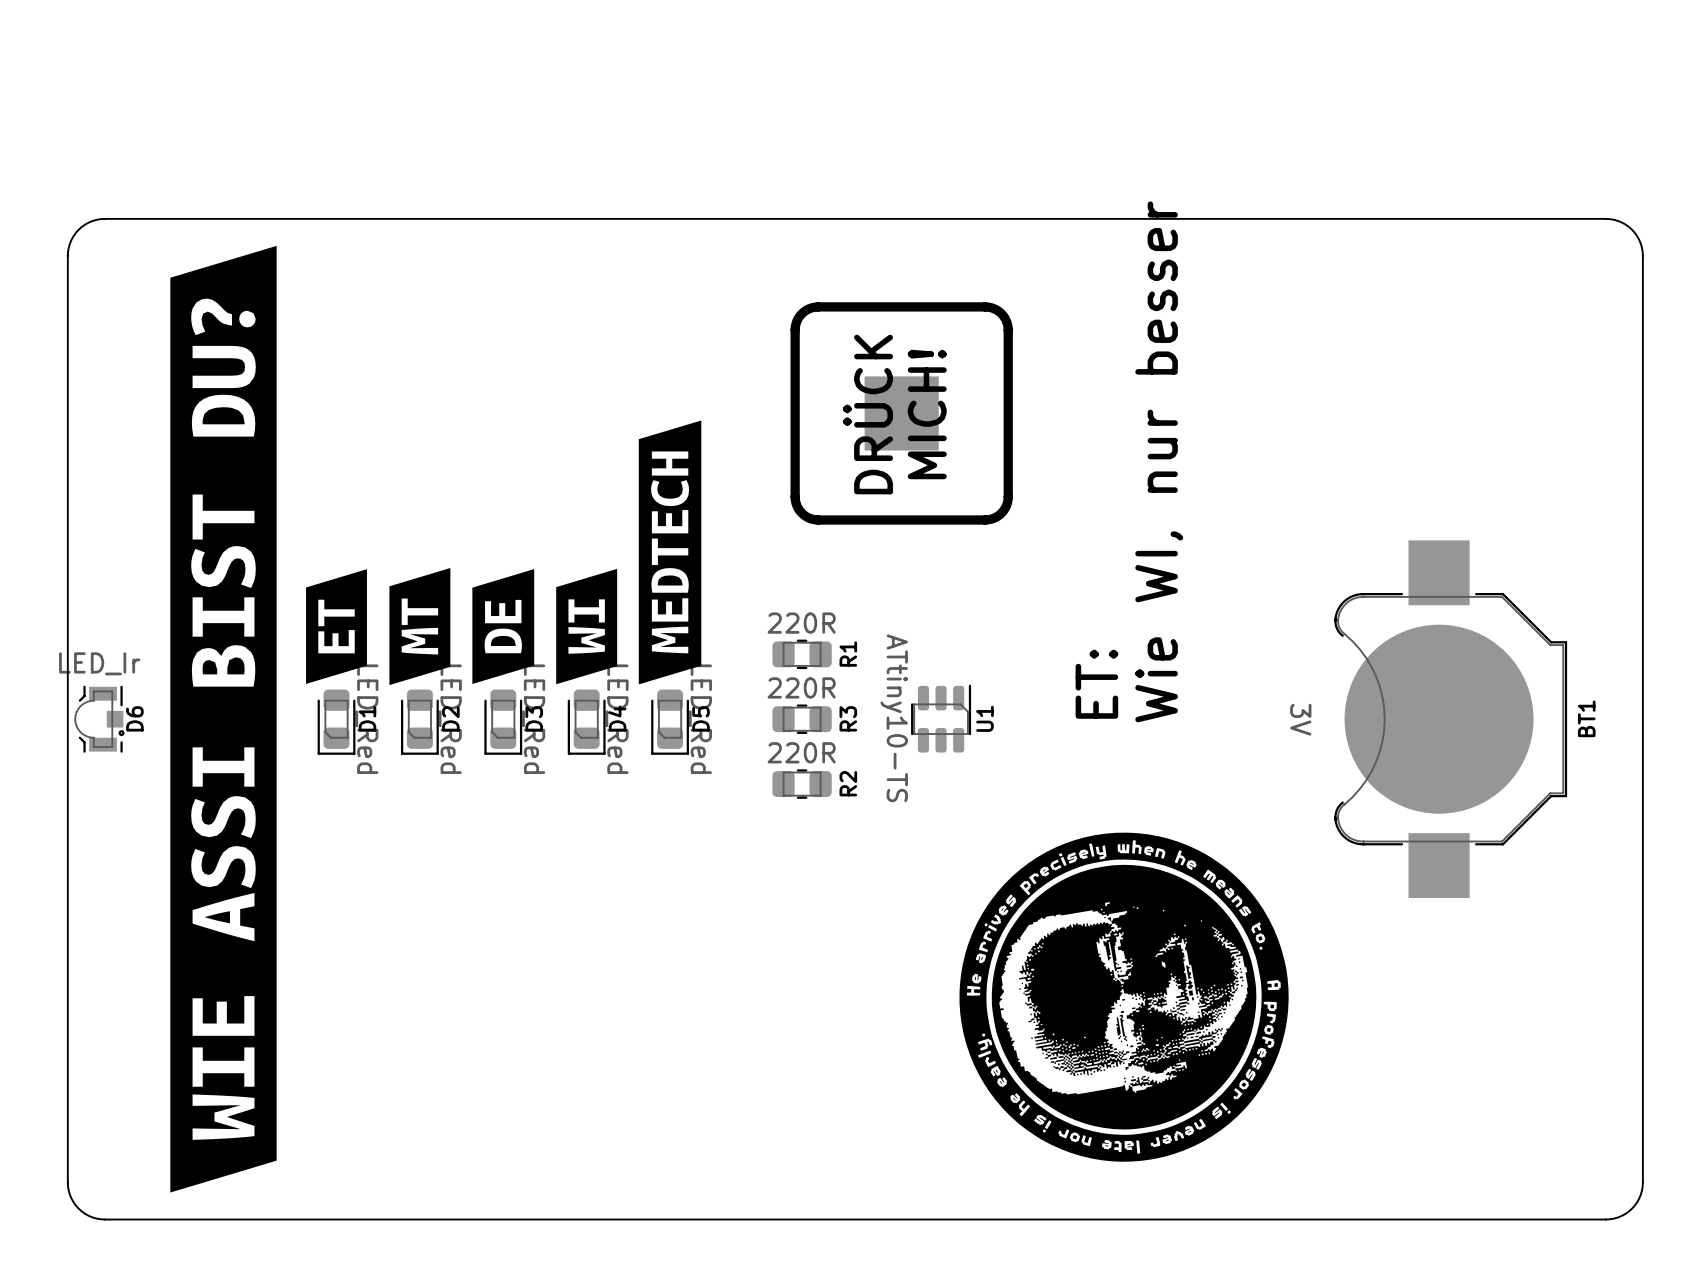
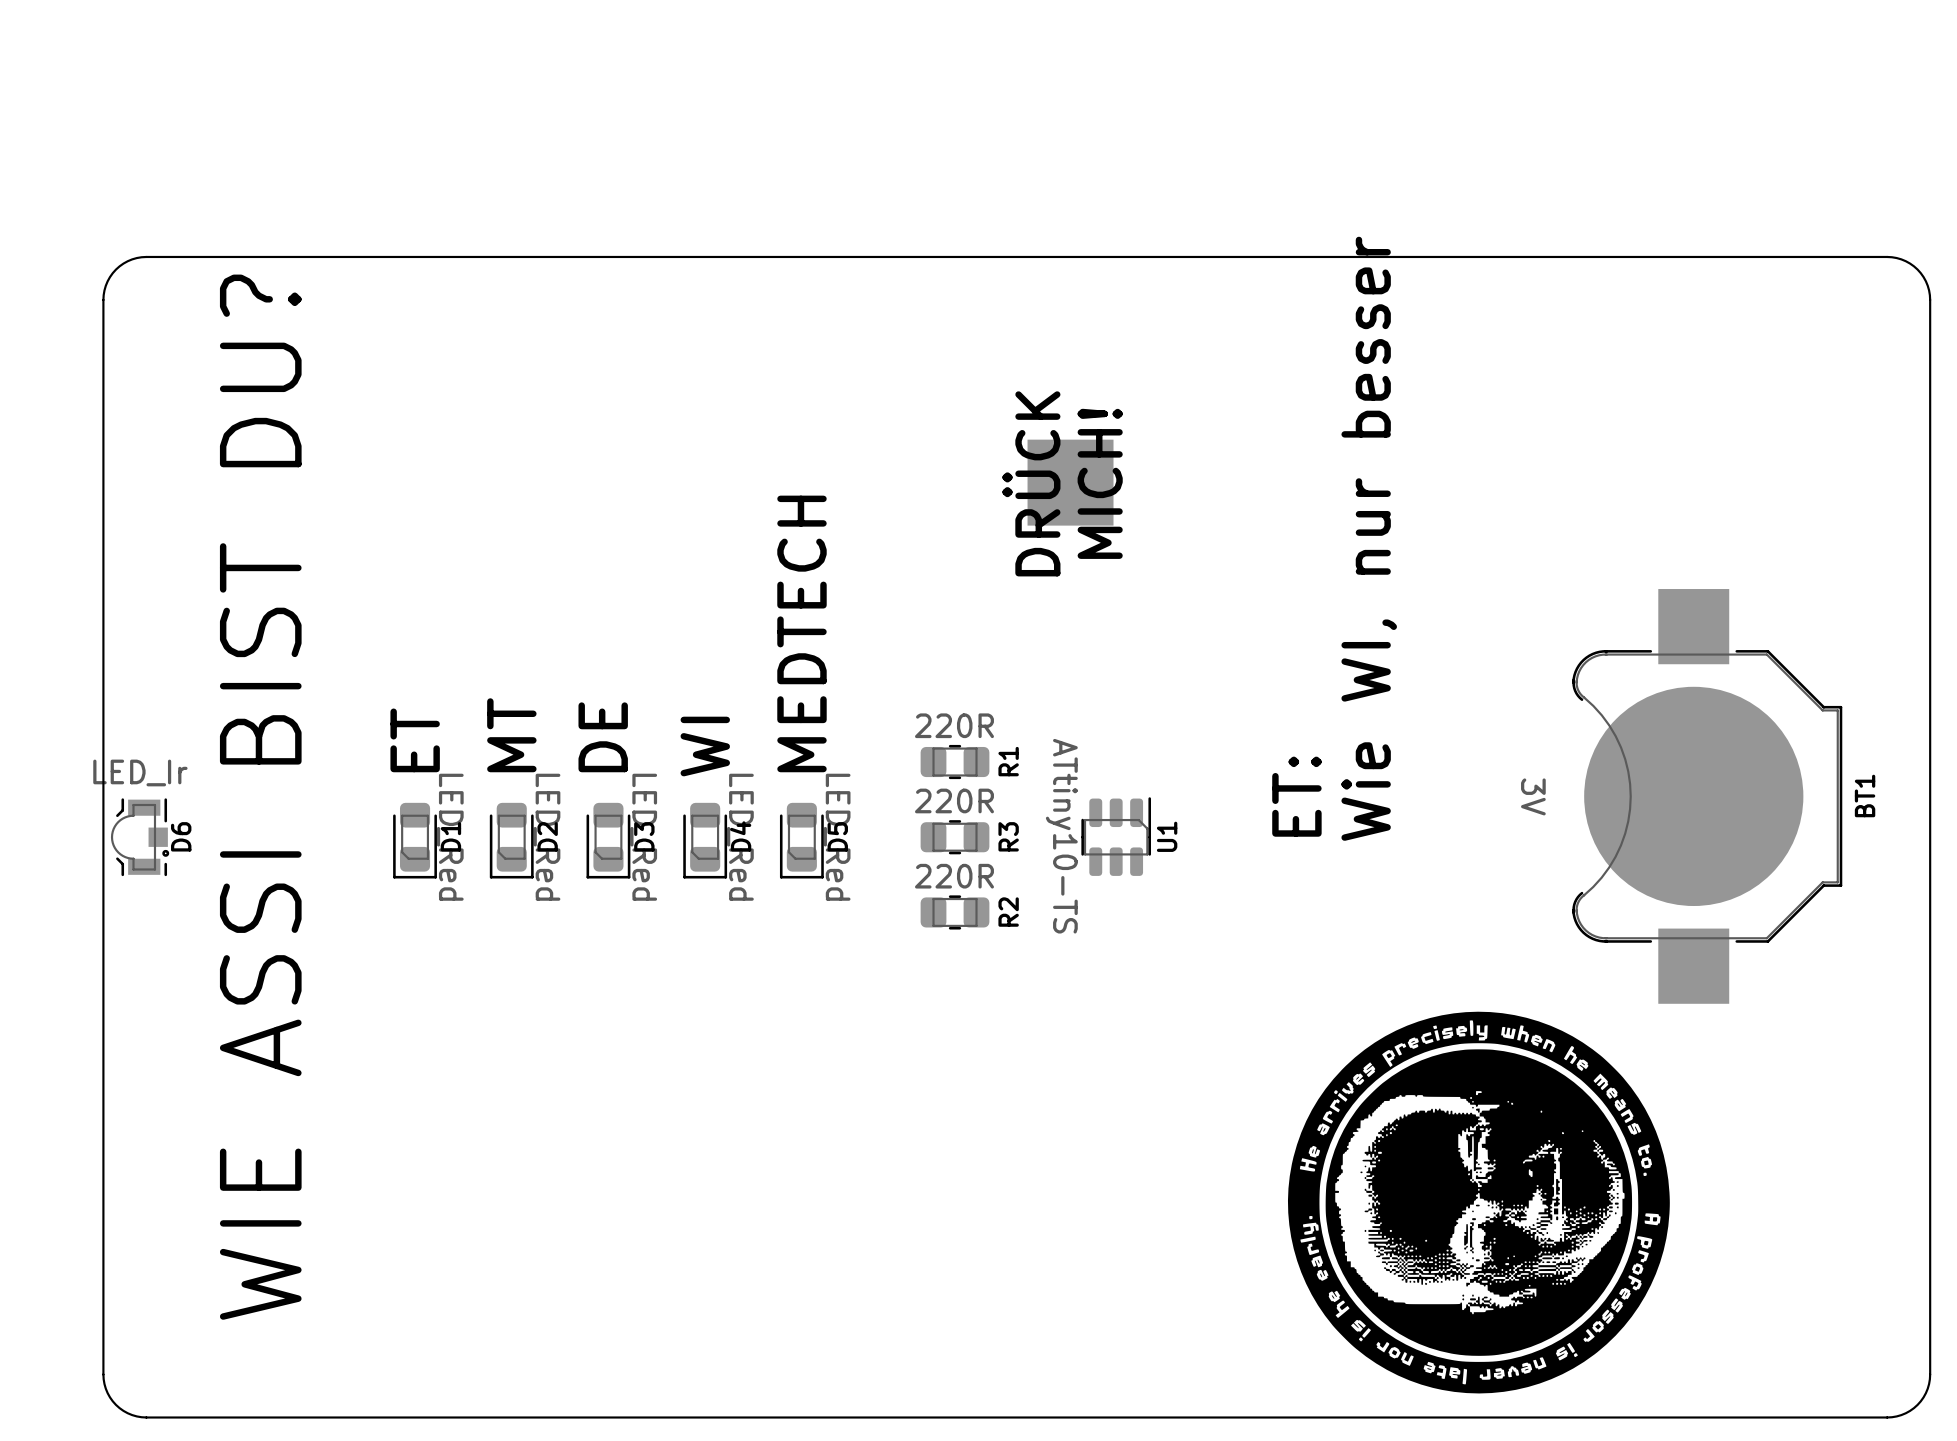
drawing: [170, 245, 277, 1193] -> none
line: (985, 306) (818, 306) (809, 308) (801, 313) (796, 321) (795, 330) (795, 496) (796, 505) (801, 513) (809, 518) (818, 520) (985, 520) (993, 518) (1001, 513) (1006, 505) (1008, 496) (1008, 327) (1001, 313) (993, 308) (985, 306) -> none
drawing: [389, 420, 702, 686] -> none
text: none -> MEDTECH (801, 633)
drawing: [306, 569, 367, 684] -> none
text: none -> MT (511, 735)
text: none -> DE (603, 737)
text: none -> ET (415, 740)
text: none -> WI (705, 746)
text: none -> WIE ASSI BIST DU? (260, 797)
BT1 position: (1450, 719) -> (1707, 796)
drawing: [959, 832, 1289, 1162] -> none
drawing: none -> [1287, 1011, 1670, 1394]

